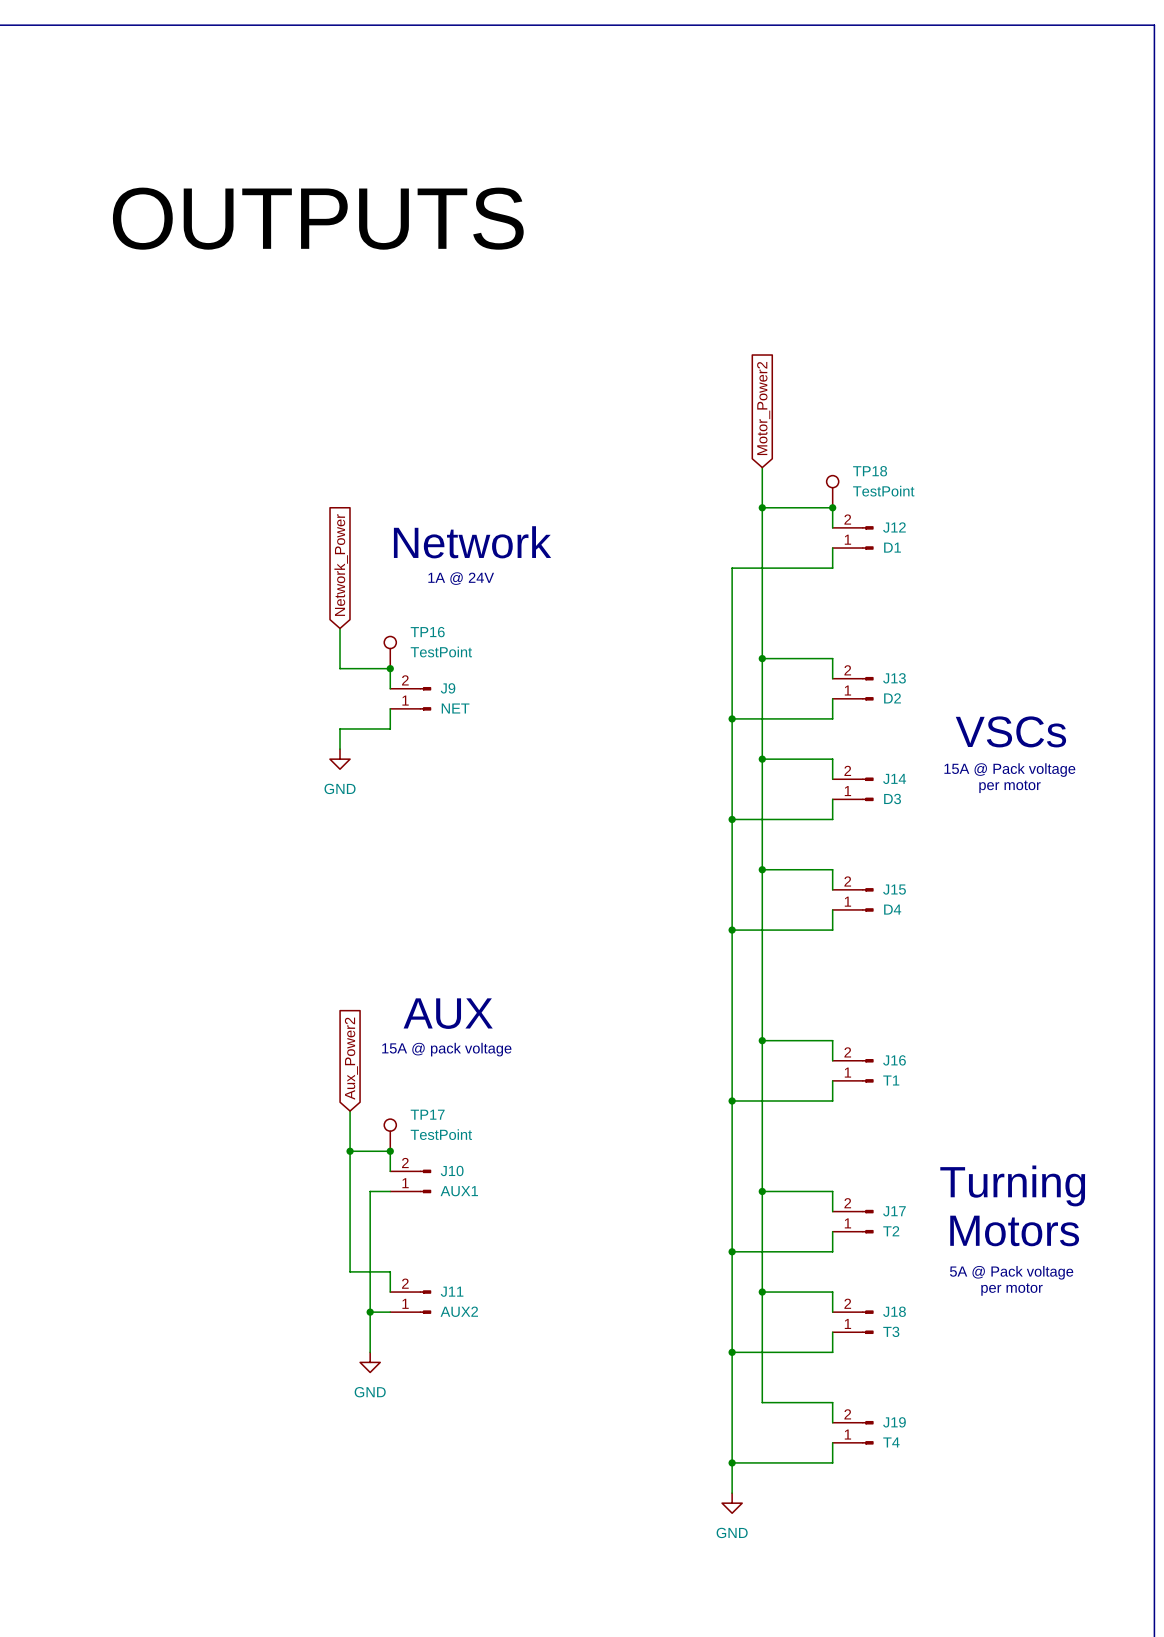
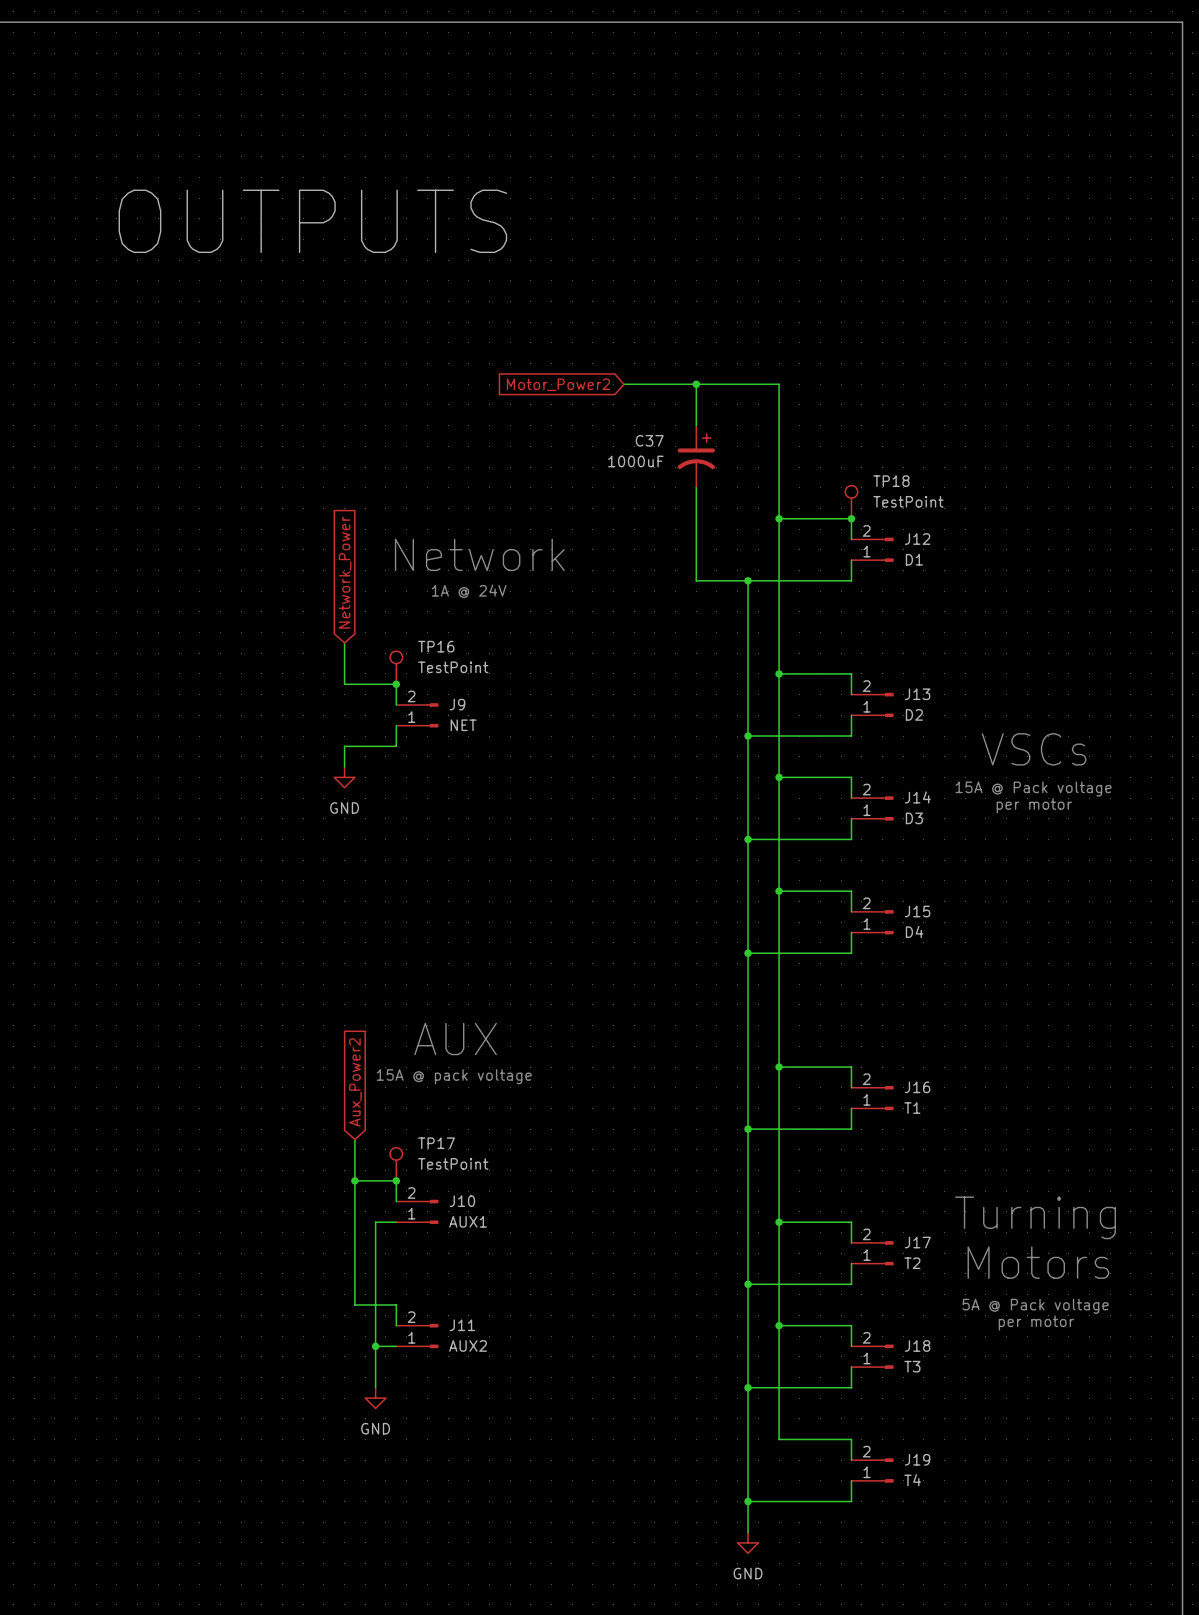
wire: none -> (623, 384) (779, 384) (779, 477)
wire: none -> (696, 384) (696, 425)
junction: none -> (696, 384)
global label rotation: 0° (763, 408) -> 90° counterclockwise (558, 384)
global label position: Motor_Power2 (763, 408) -> Motor_Power2 (558, 384)
C37: none -> 1000uF (696, 456)
wire: none -> (696, 487) (696, 580) (748, 580)
junction: none -> (748, 580)

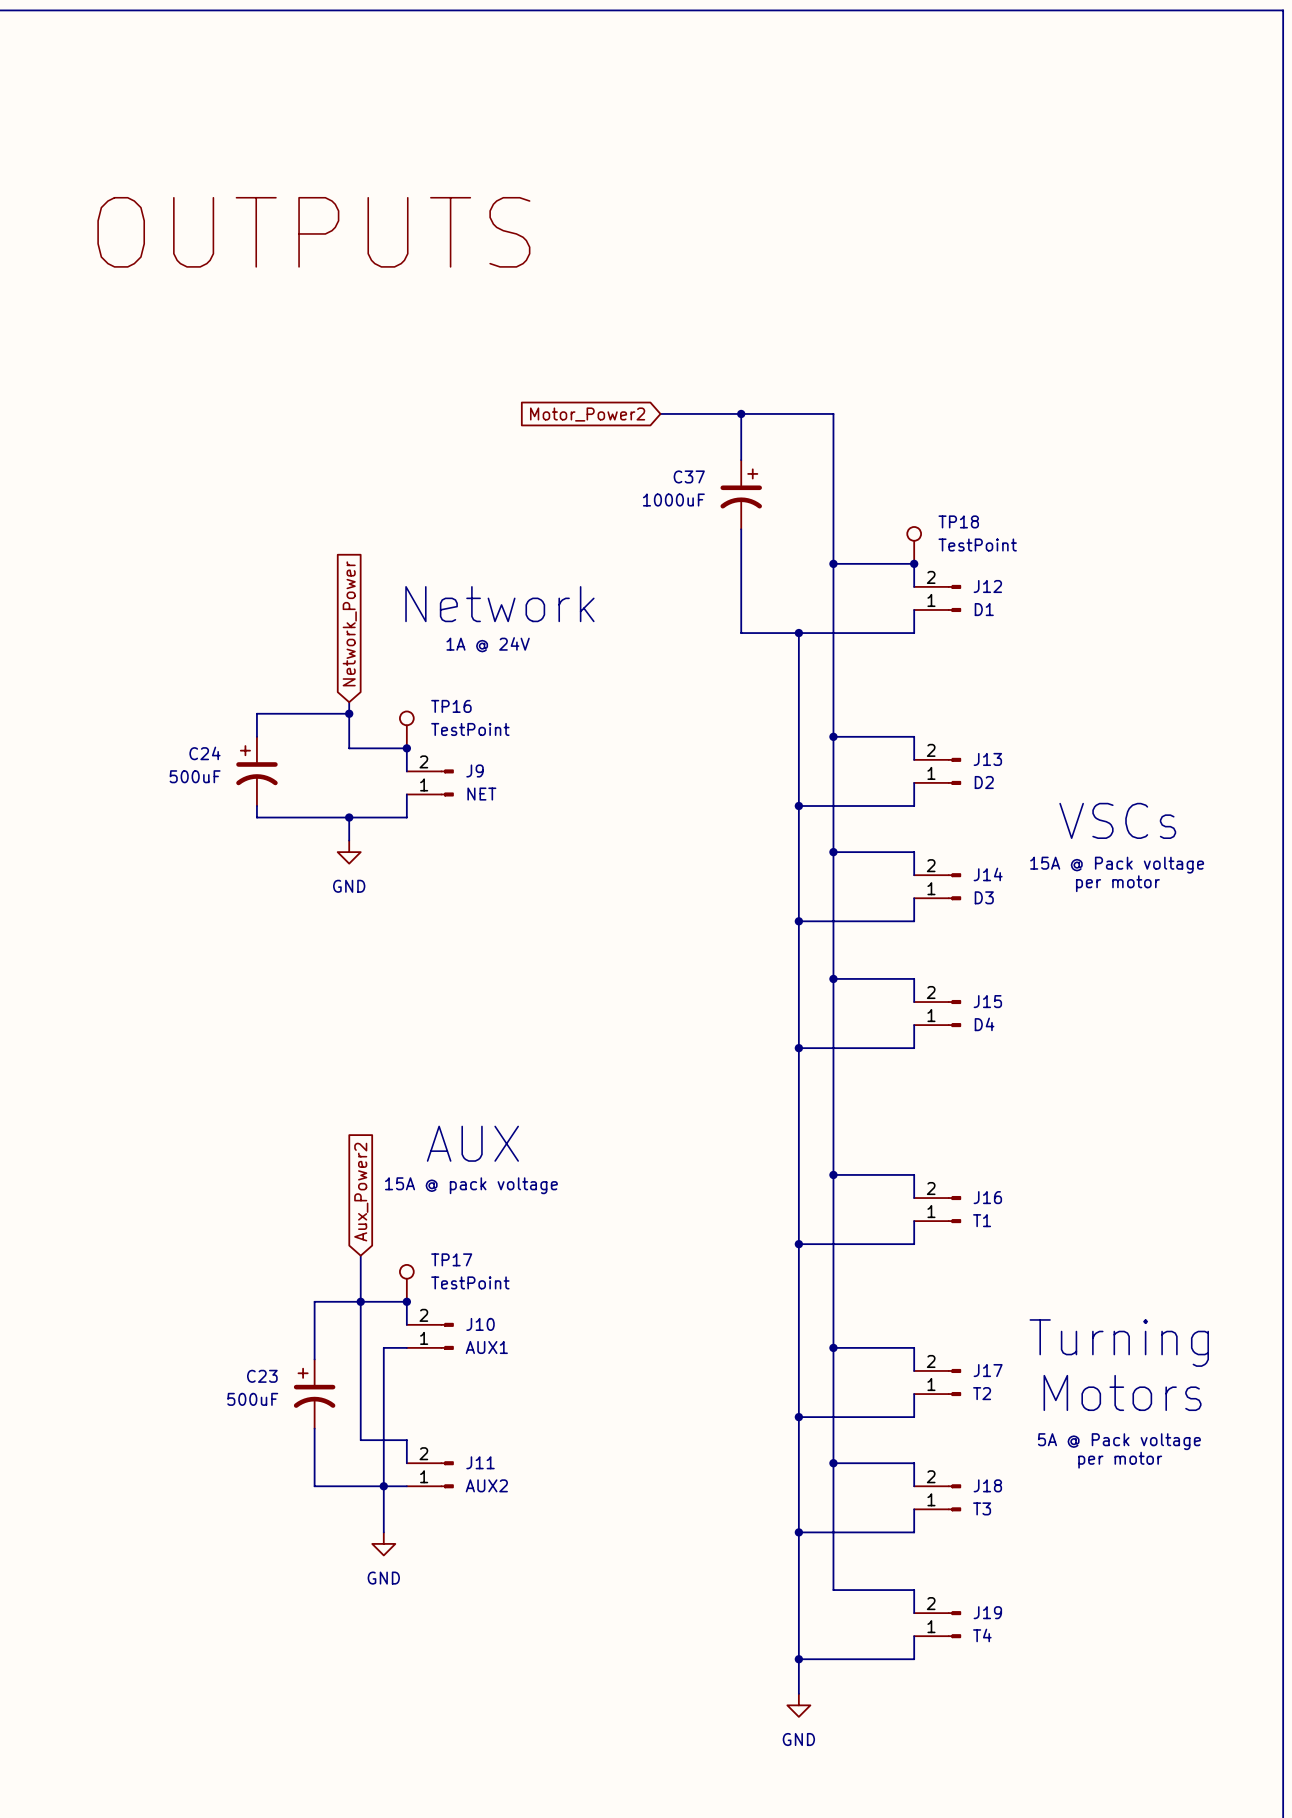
wire: none -> (349, 713) (256, 713) (256, 736)
junction: none -> (349, 713)
C24: none -> 500uF (256, 771)
wire: none -> (256, 806) (256, 817) (349, 817)
junction: none -> (349, 817)
wire: none -> (360, 1301) (314, 1301) (314, 1359)
C23: none -> 500uF (314, 1394)
wire: none -> (314, 1428) (314, 1486) (383, 1486)

